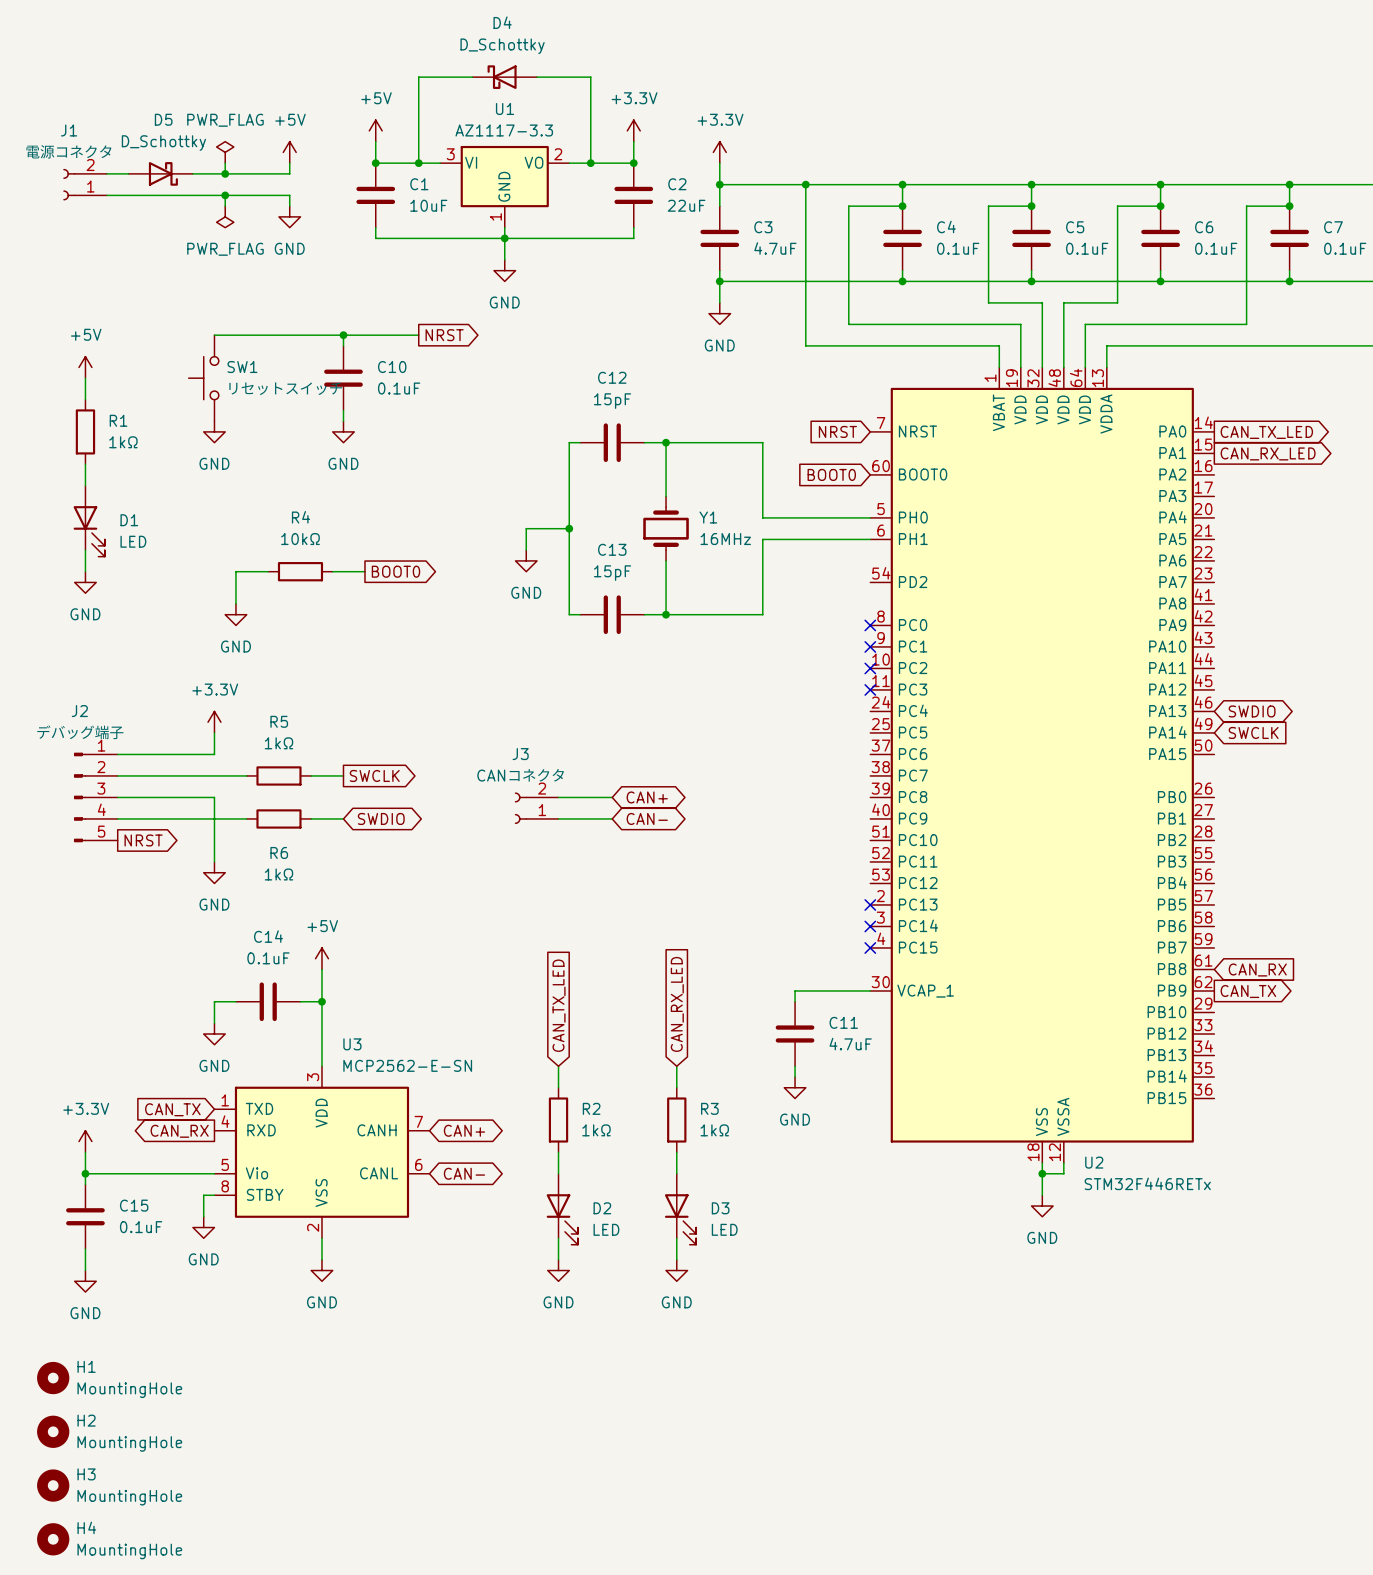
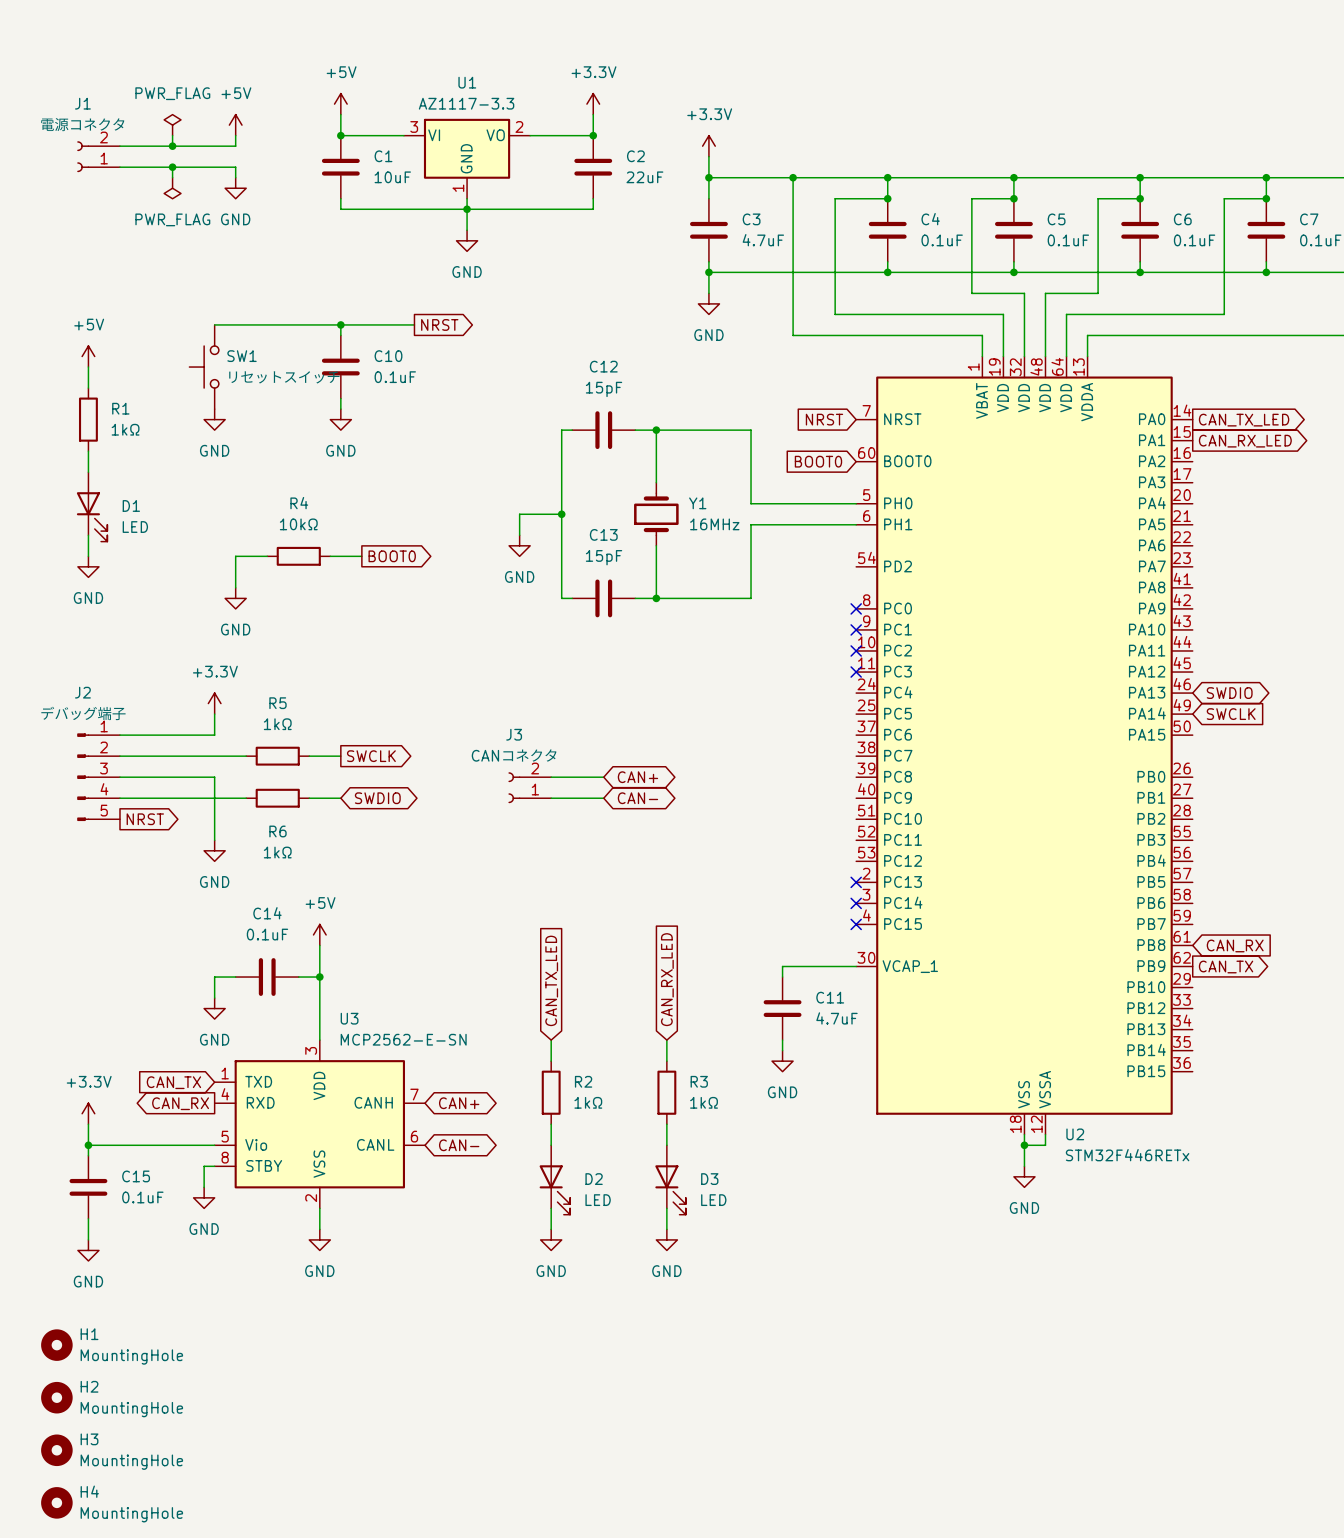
wire: (472, 77) (418, 77) (418, 163) -> none
D4: D_Schottky (504, 77) -> none
wire: (537, 77) (590, 77) (590, 163) -> none
power symbol: none -> +5V (340, 104)
power symbol: none -> PWR_FLAG (172, 125)
power symbol: none -> +5V (235, 125)
power symbol: +5V (375, 130) -> none
power symbol position: +3.3V (633, 130) -> +3.3V (593, 104)
wire: none -> (235, 135) (235, 146) (119, 146)
wire: (375, 141) (375, 163) (440, 163) -> (340, 114) (340, 135) (403, 135)
junction: none -> (593, 135)
wire: (633, 141) (633, 163) (569, 163) -> (593, 114) (593, 135) (530, 135)
junction: none -> (172, 146)
power symbol: PWR_FLAG (225, 152) -> none
power symbol: +5V (289, 152) -> none
wire: (225, 163) (225, 173) -> (172, 135) (172, 146)
wire: (289, 163) (289, 173) (235, 173) -> (235, 177) (235, 167)
junction position: (375, 163) -> (340, 135)
junction: (418, 163) -> none
junction: (590, 163) -> none
junction: (633, 163) -> none
D5: D_Schottky (160, 173) -> none
junction: none -> (172, 167)
junction: (225, 173) -> none
J1 position: (85, 184) -> (98, 156)
U1 position: (504, 186) -> (467, 158)
wire: (106, 195) (289, 195) (289, 206) -> none
power symbol: none -> PWR_FLAG (172, 188)
junction: (225, 195) -> none
C1 position: (375, 195) -> (340, 167)
C2 position: (633, 195) -> (593, 167)
power symbol: PWR_FLAG (225, 216) -> none
power symbol position: GND (289, 216) -> GND (235, 188)
junction: none -> (467, 209)
wire: (375, 227) (375, 238) (633, 238) (633, 227) -> (340, 198) (340, 209) (593, 209) (593, 198)
wire: (504, 227) (504, 259) -> (467, 198) (467, 230)
junction: (504, 238) -> none
power symbol position: GND (504, 270) -> GND (467, 240)

